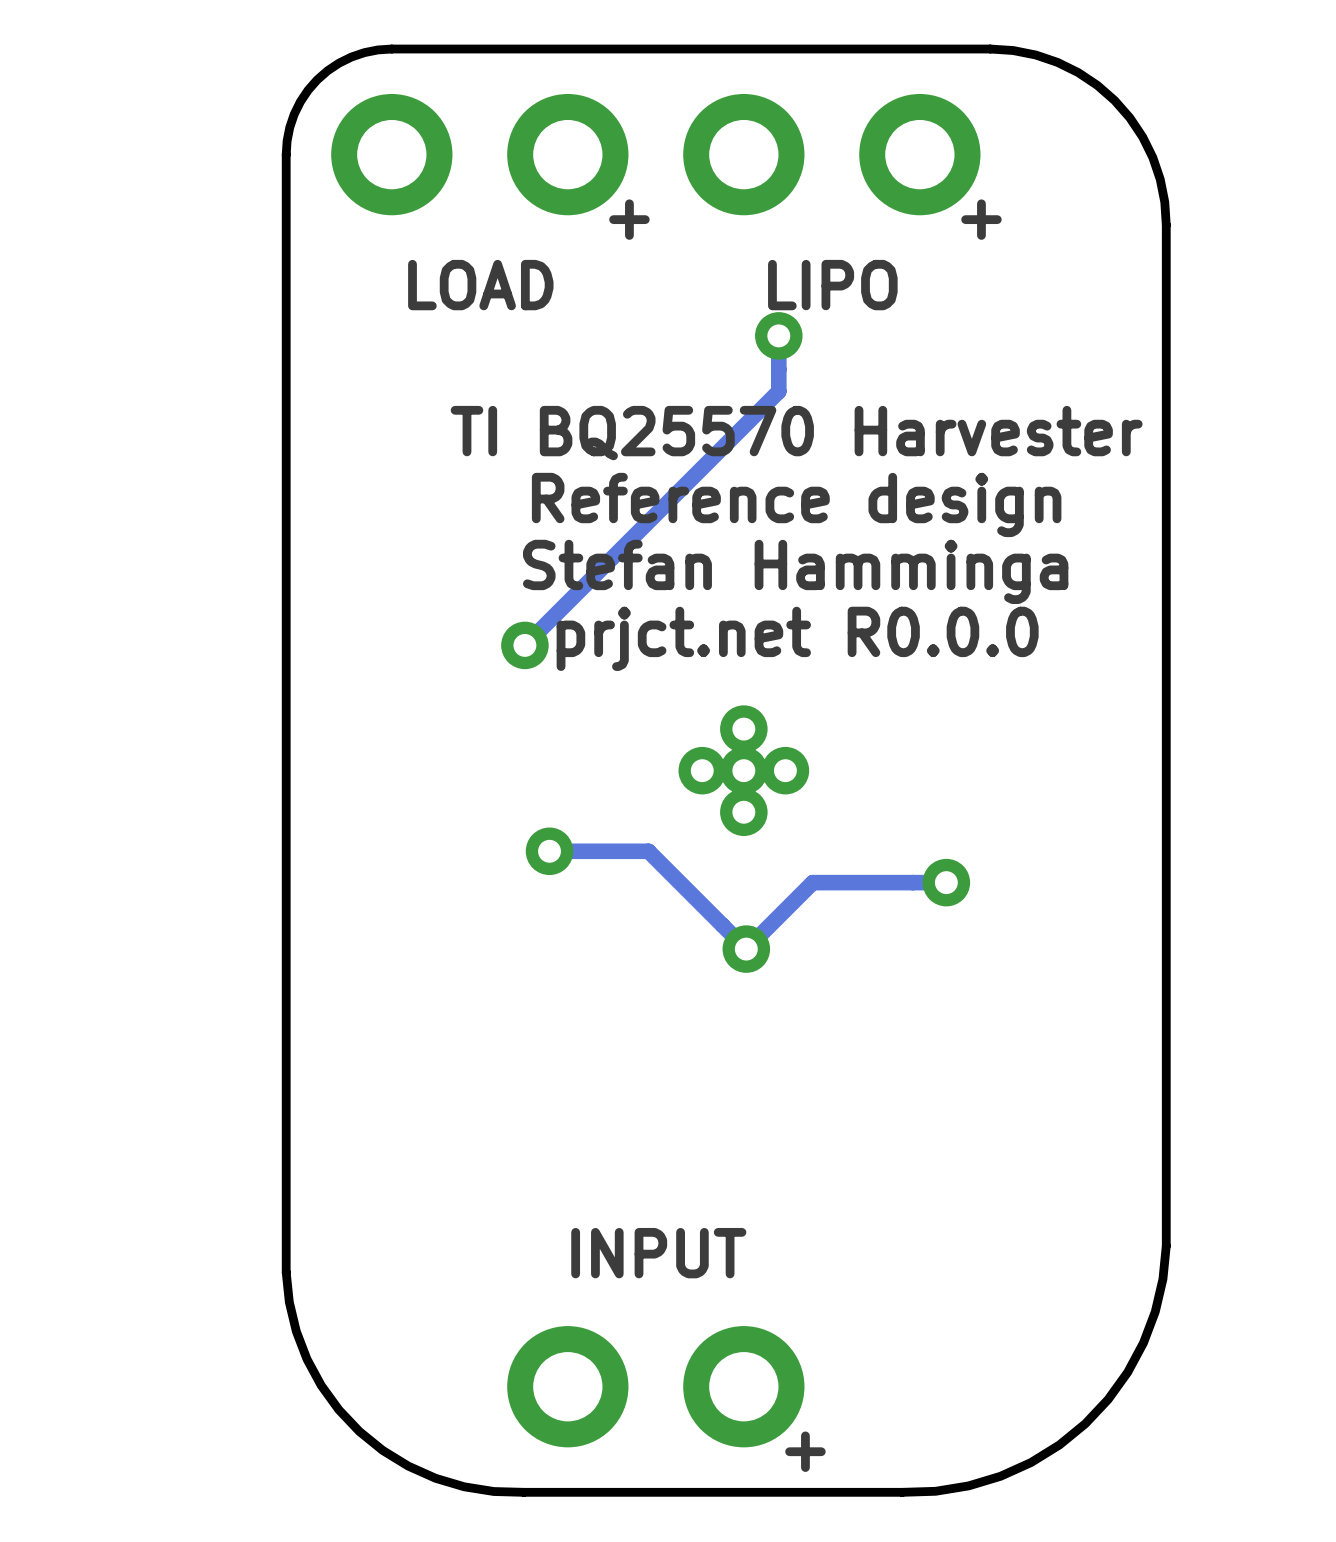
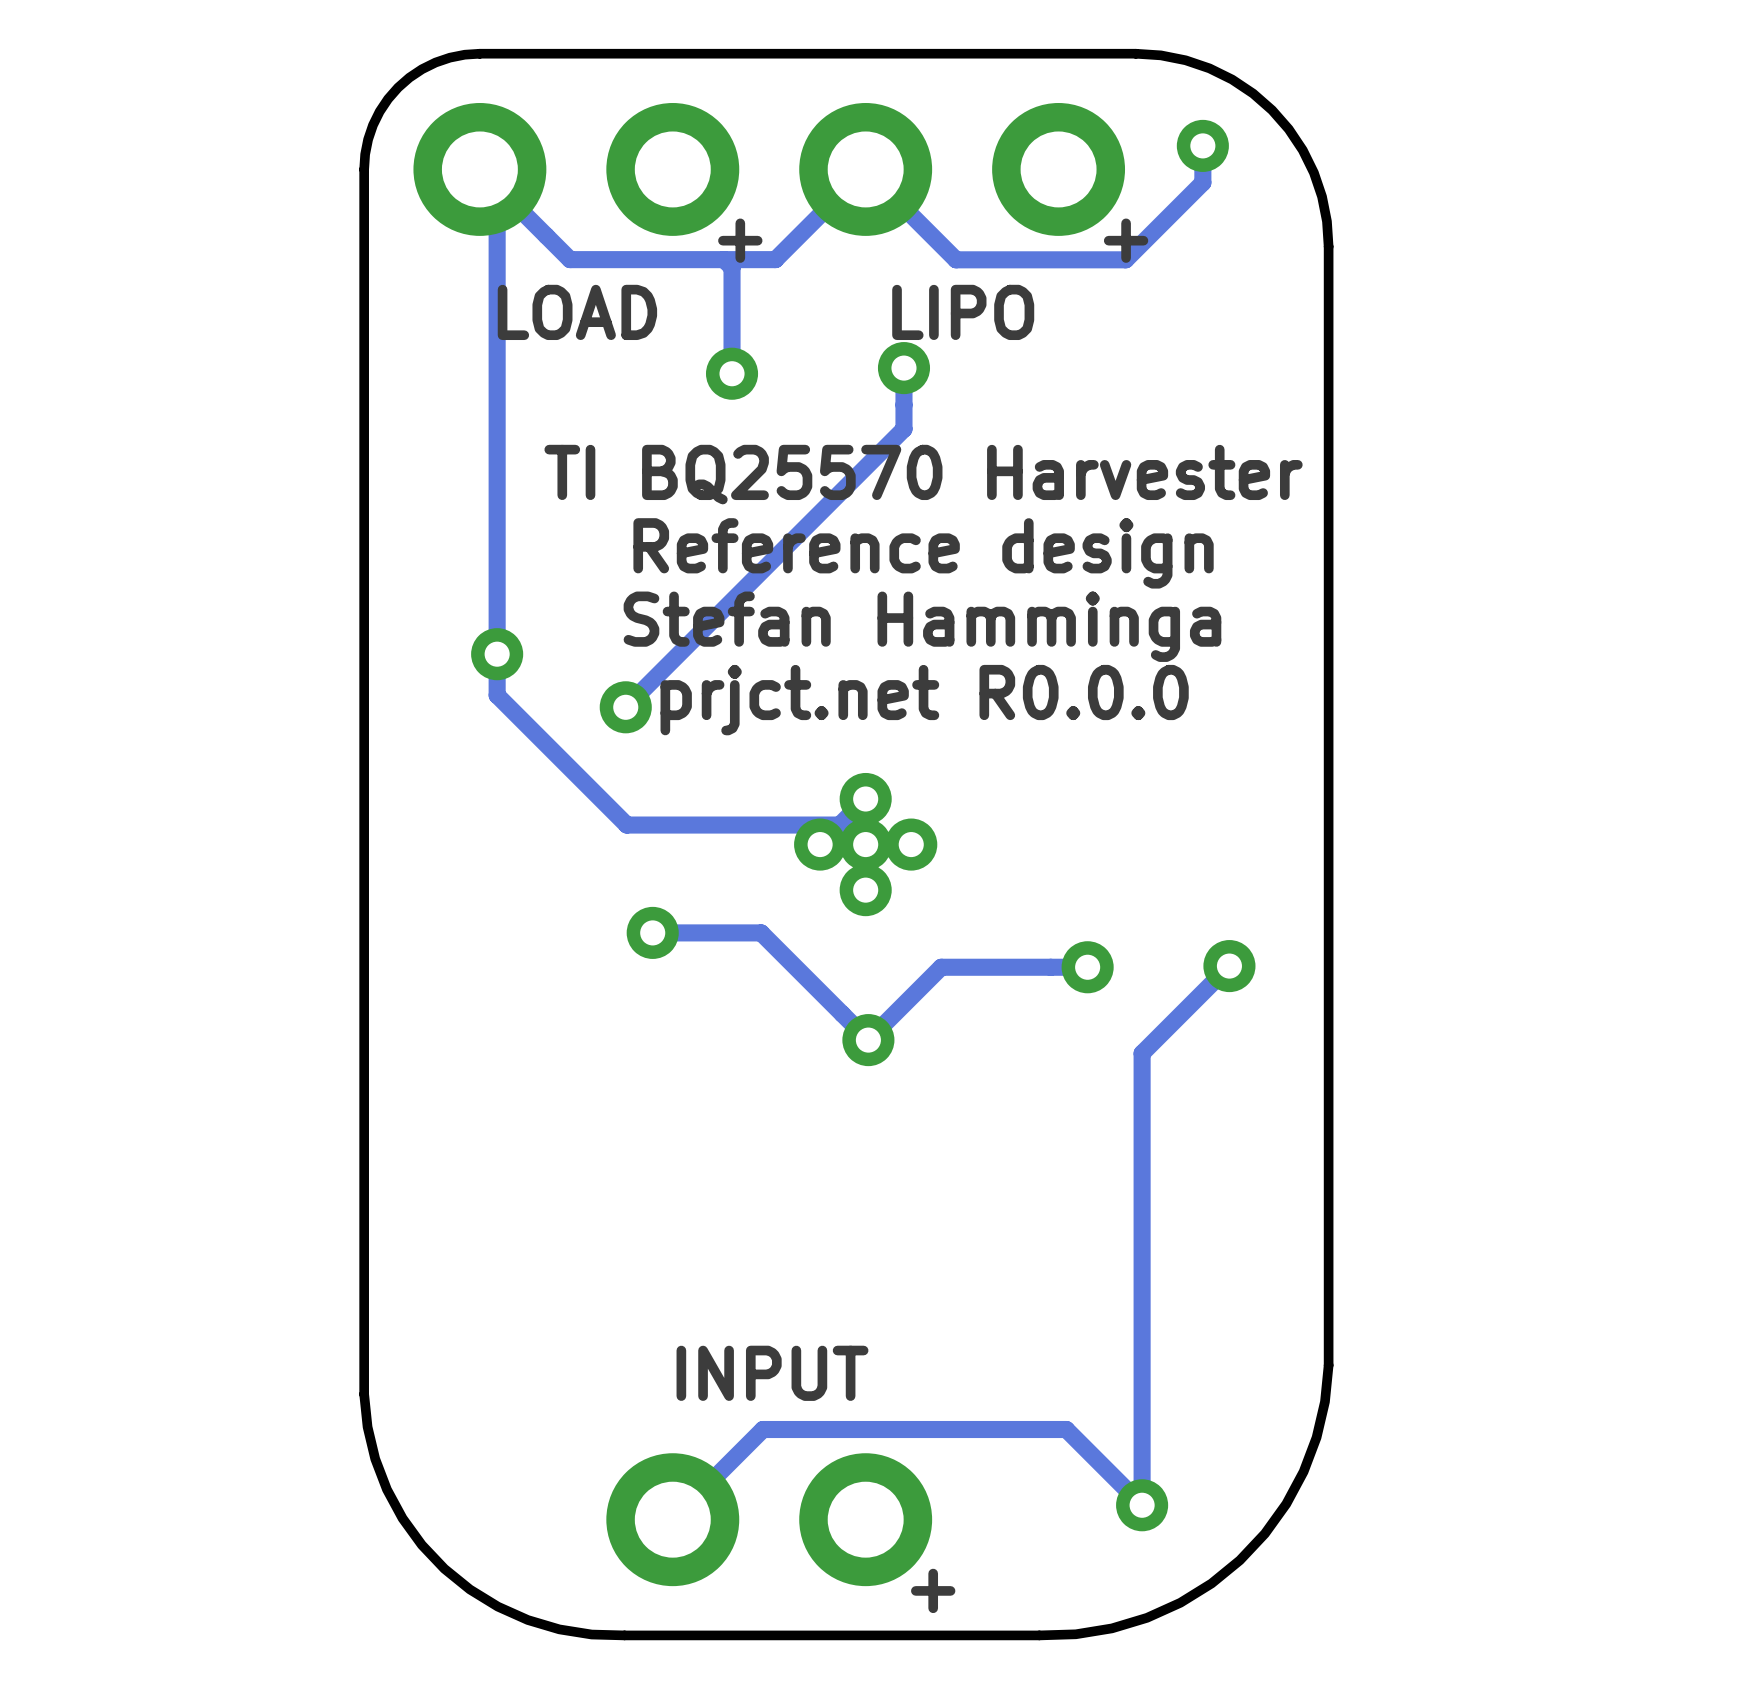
track: none -> (1202, 145) (1202, 182) (1125, 259) (956, 259) (865, 169) (775, 259) (570, 259) (479, 169)
via: none -> (1202, 145)
track: none -> (497, 186) (497, 695) (626, 825) (839, 825) (865, 799)
track: none -> (723, 259) (732, 267) (732, 373)
via: none -> (732, 373)
via: none -> (497, 654)
track: none -> (1229, 966) (1142, 1053) (1142, 1505) (1066, 1429) (762, 1429) (672, 1519)
via: none -> (1229, 966)
via: none -> (1142, 1505)

